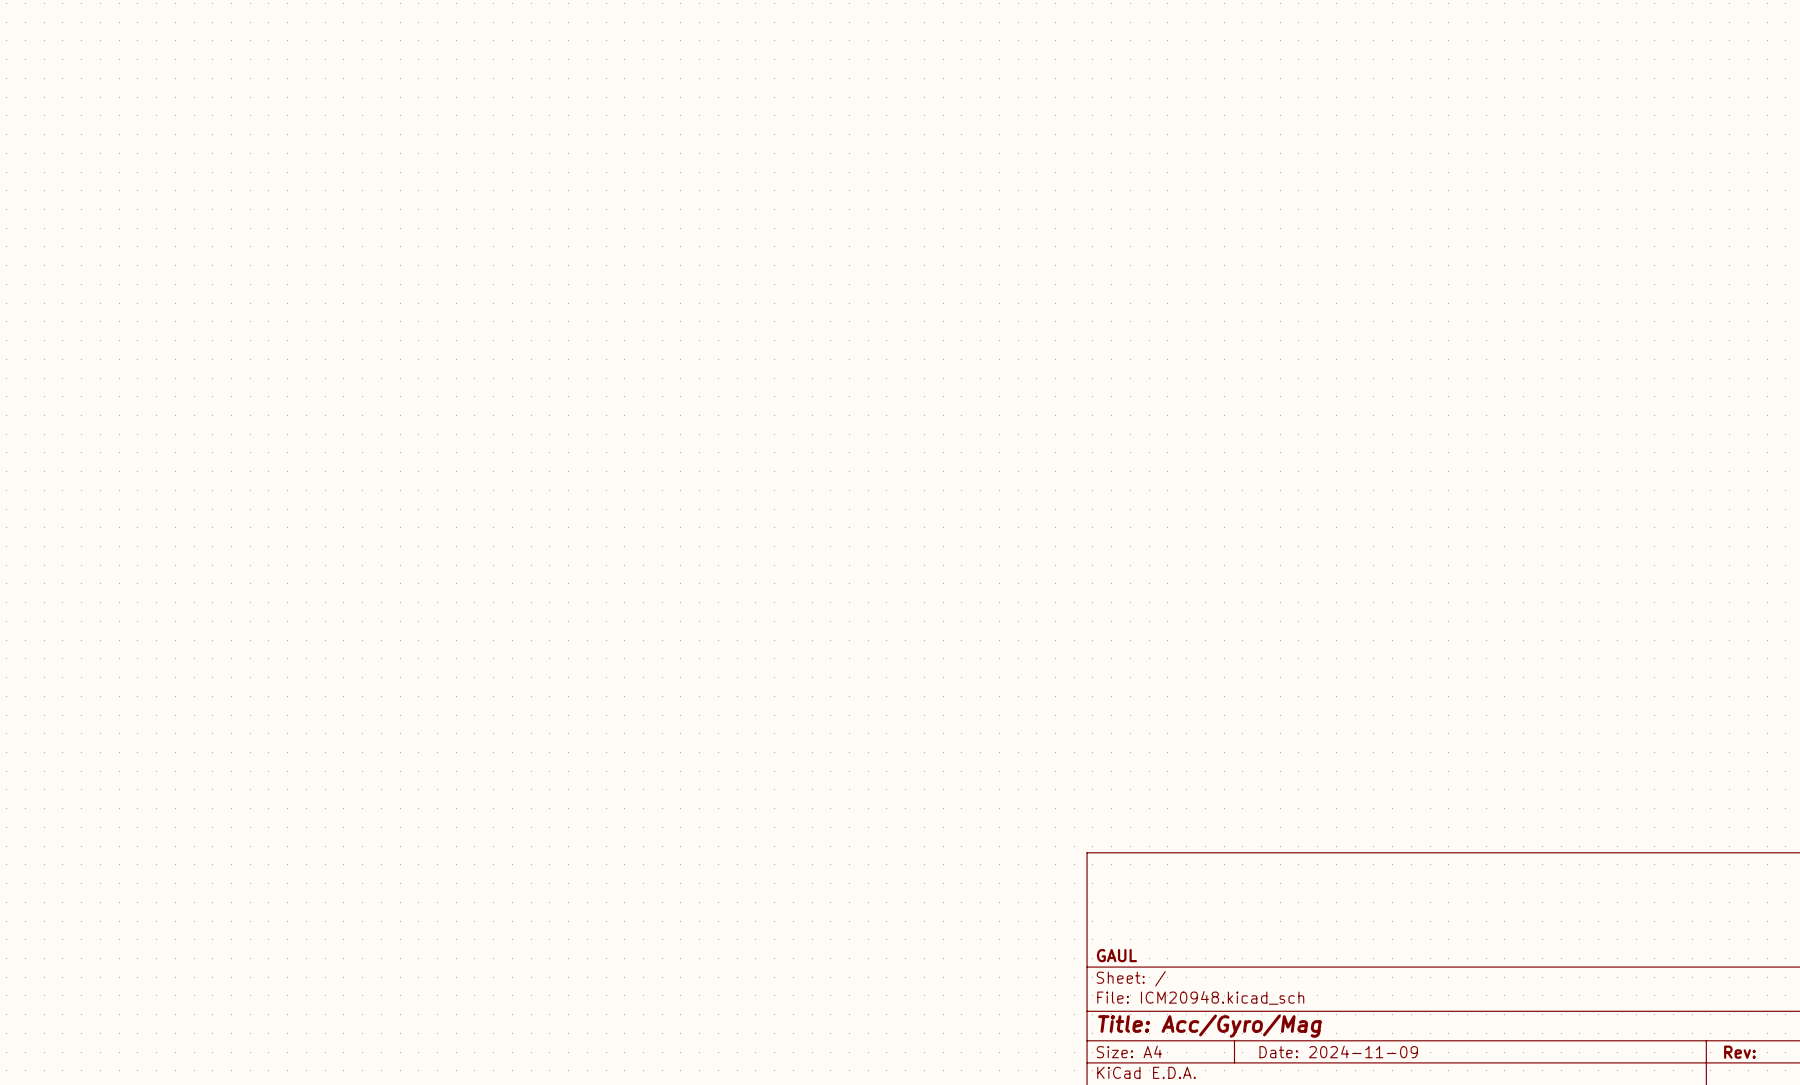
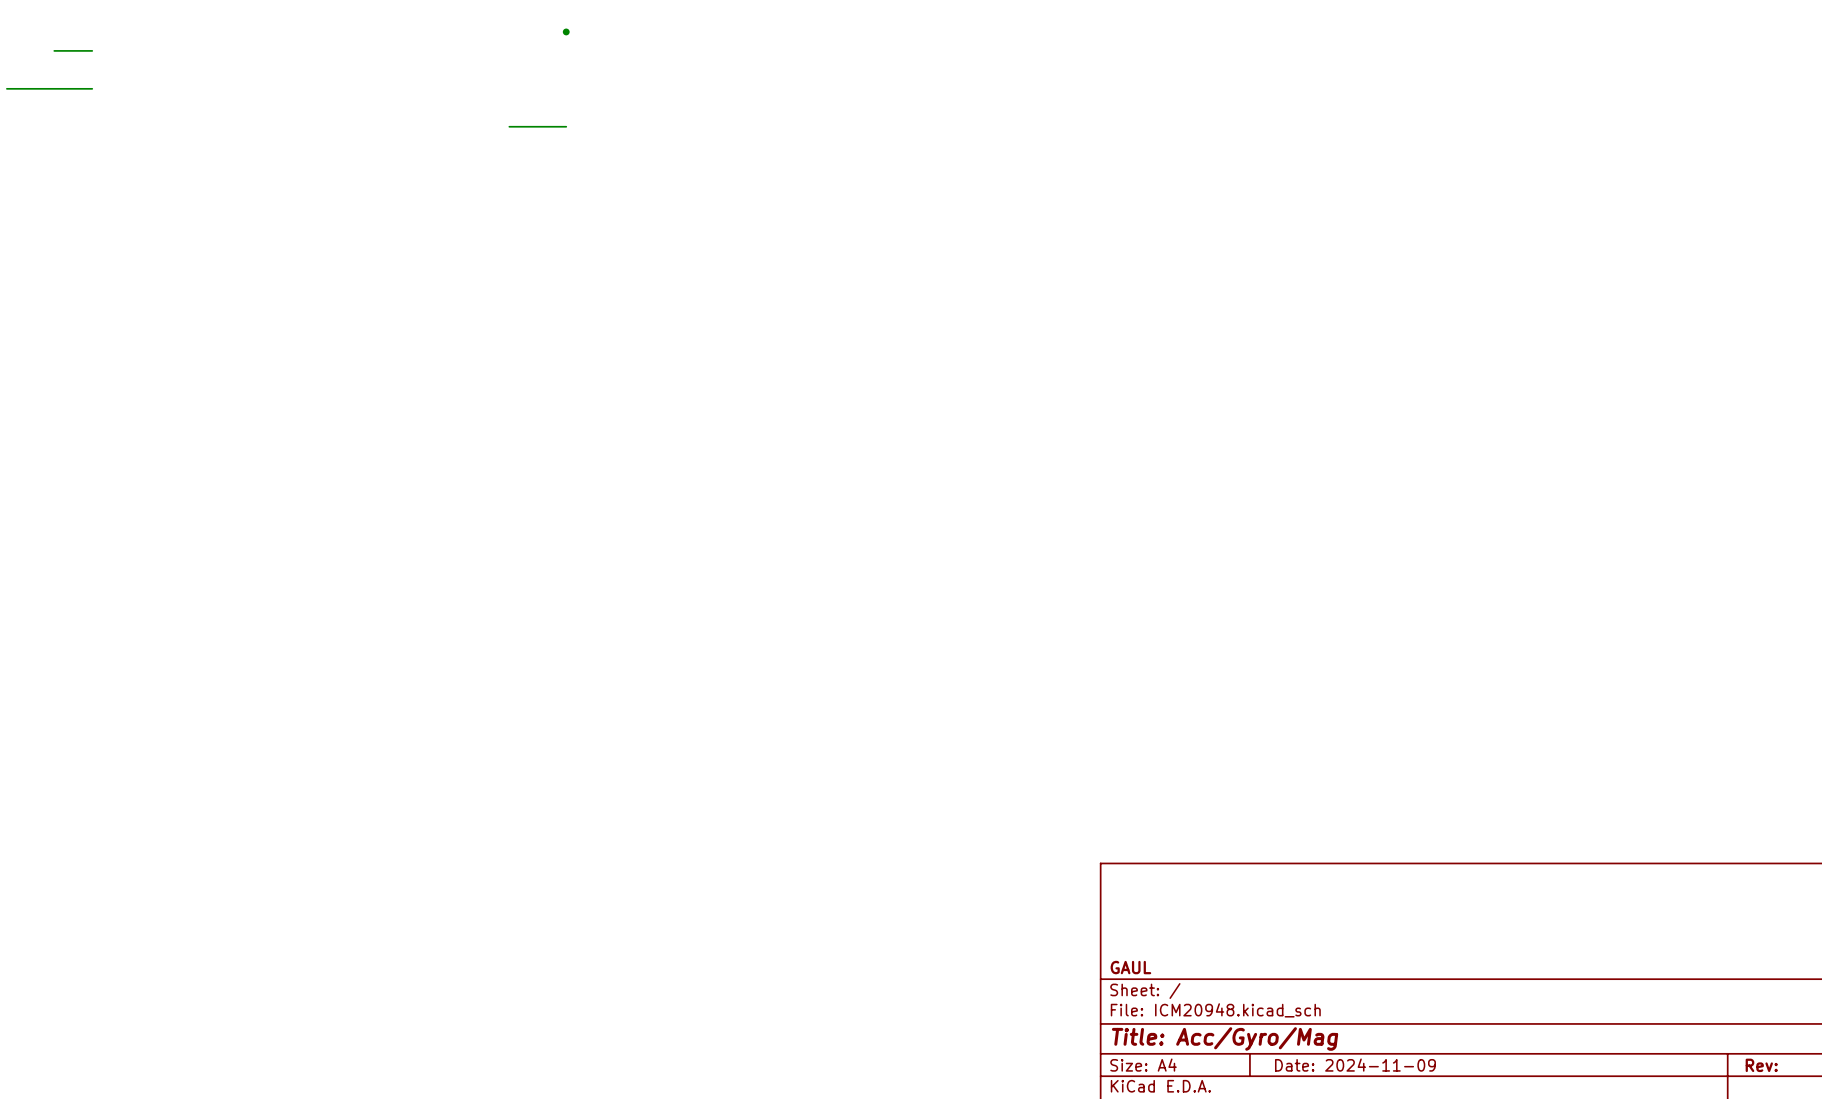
junction: none -> (566, 31)
wire: none -> (54, 50) (92, 50)
wire: none -> (6, 88) (92, 88)
wire: none -> (509, 126) (566, 126)

